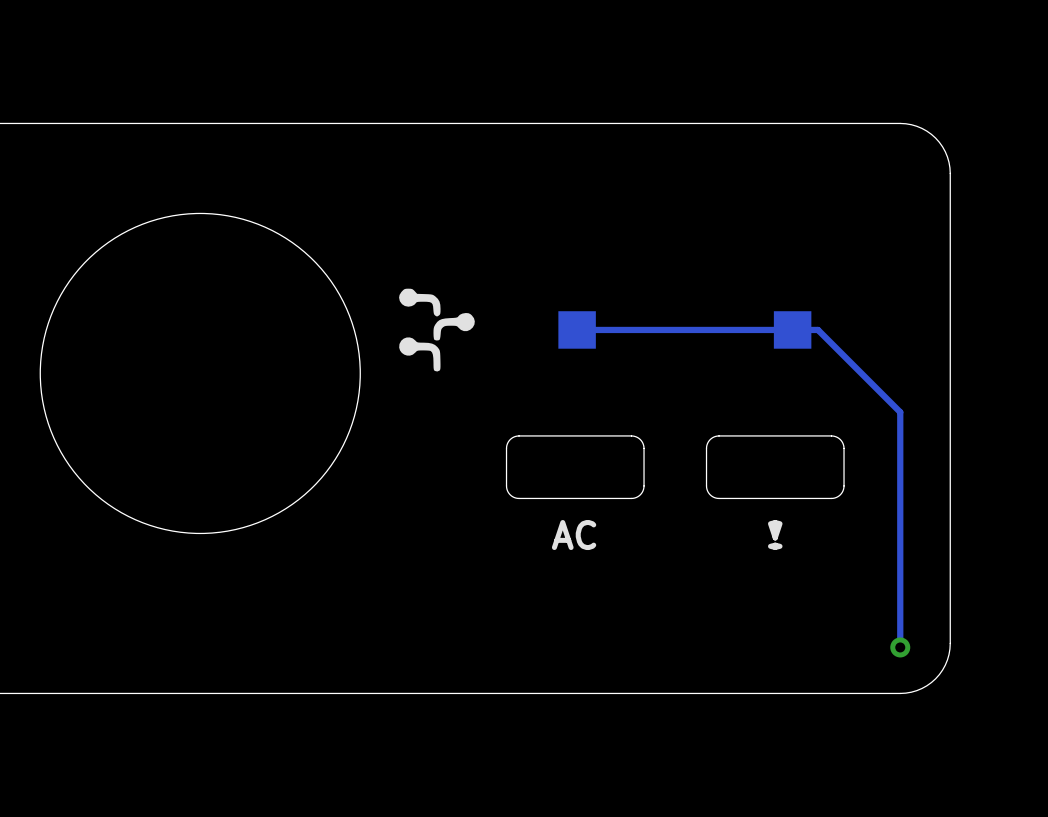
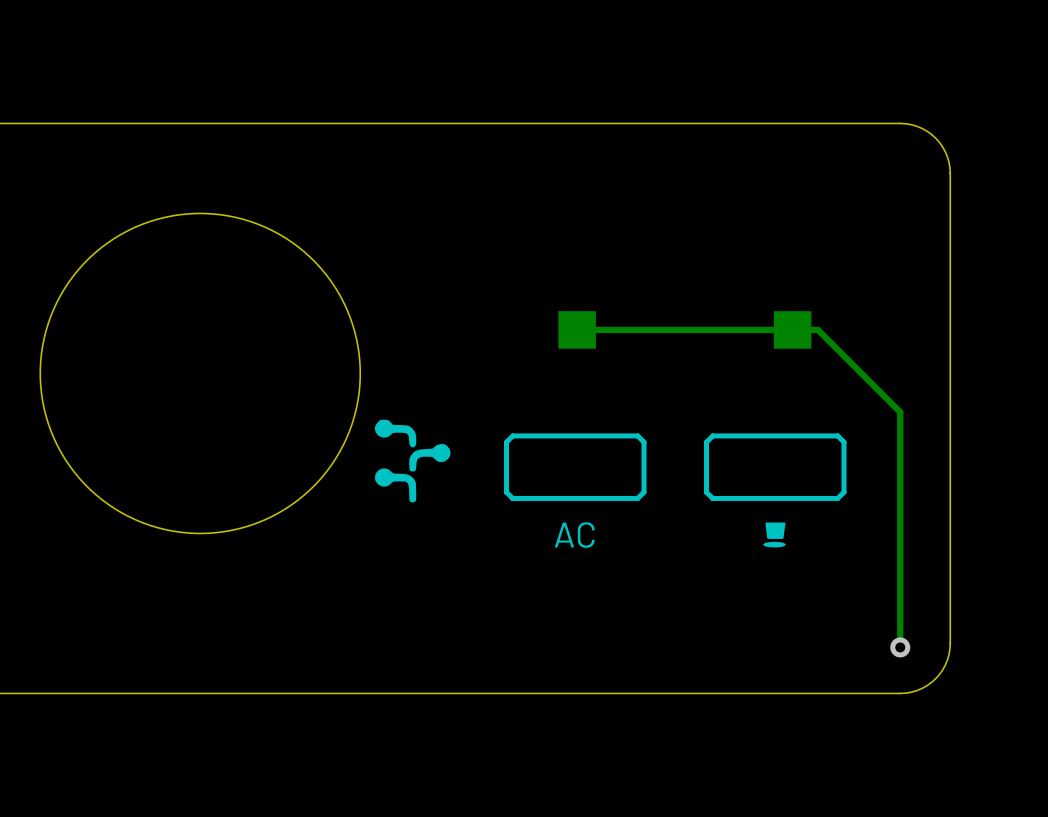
drawing position: (436, 330) -> (412, 461)
line: none -> (512, 435) (506, 442) (506, 492) (512, 498) (637, 498) (644, 492) (644, 442) (637, 435) (512, 435)
board edge: (519, 435) (636, 436) (641, 440) (643, 446) (643, 490) (637, 496) (631, 498) (514, 497) (509, 493) (506, 487) (506, 446) (511, 438) (519, 435) -> none
line: none -> (712, 435) (837, 435) (844, 442) (844, 492) (837, 498) (712, 498) (706, 492) (706, 442) (712, 435)
board edge: (719, 435) (836, 436) (841, 440) (843, 446) (843, 490) (839, 495) (831, 498) (714, 497) (709, 493) (706, 487) (706, 446) (711, 438) (719, 435) -> none

